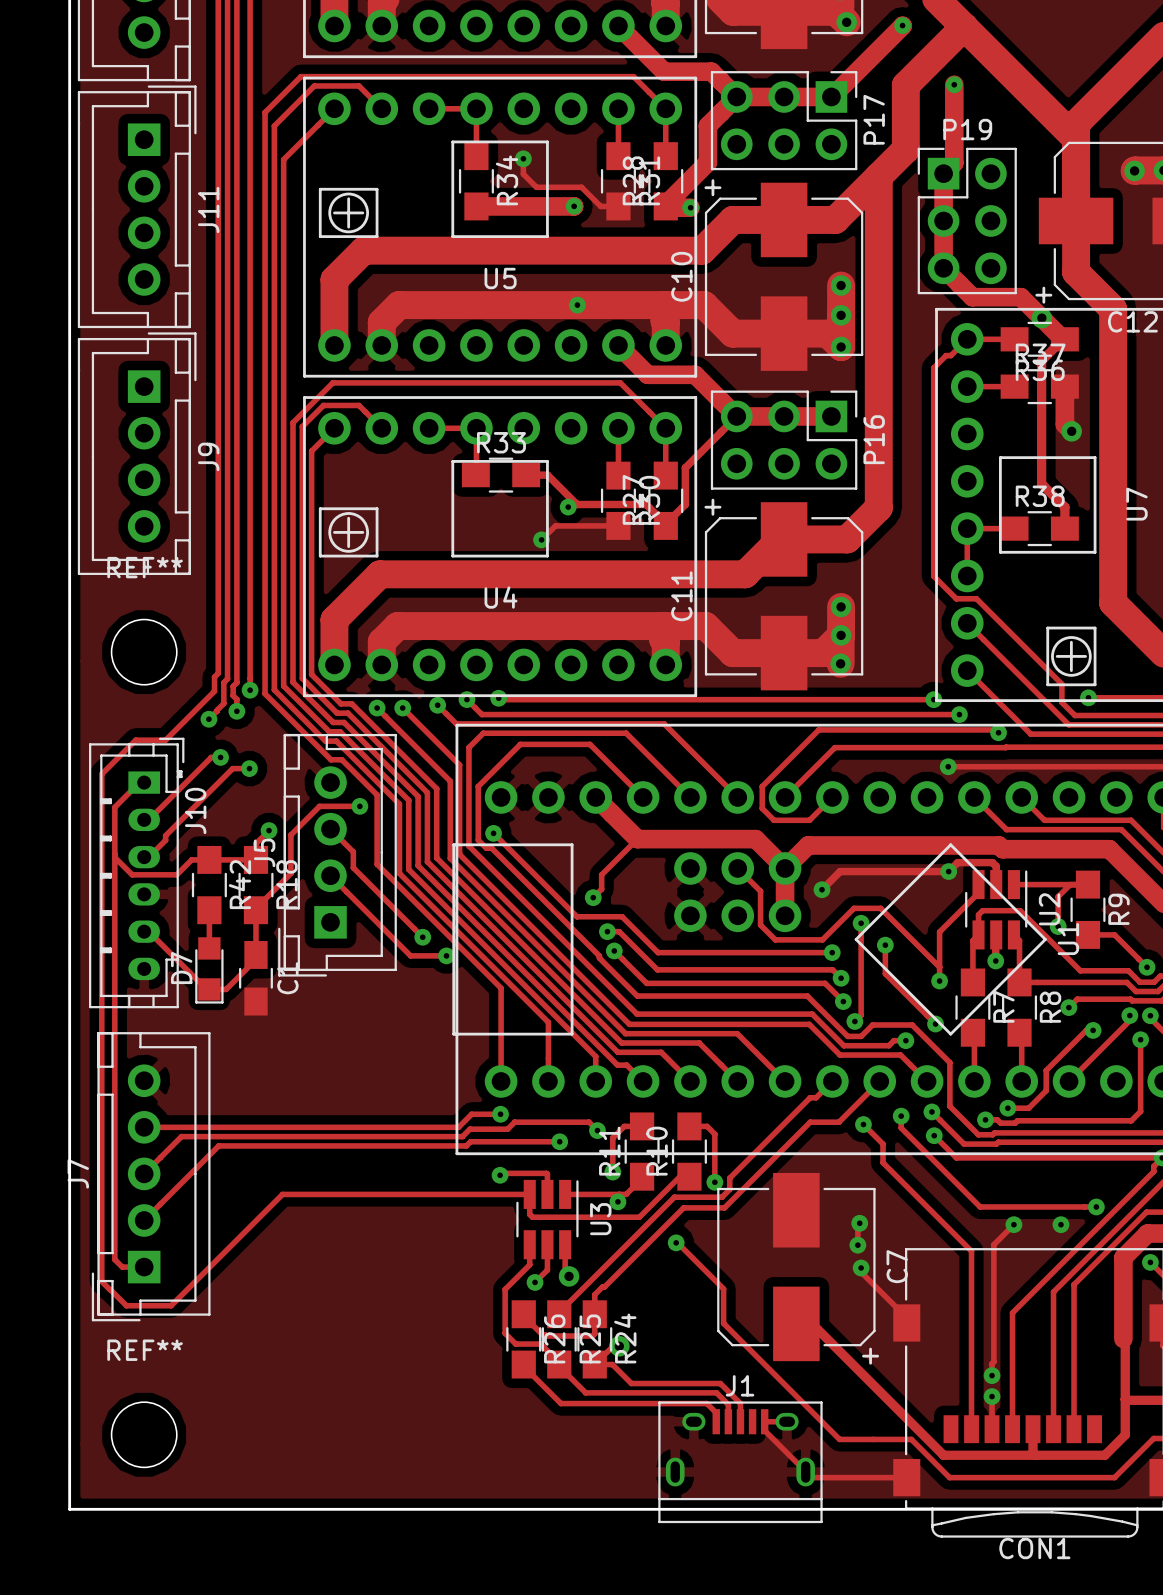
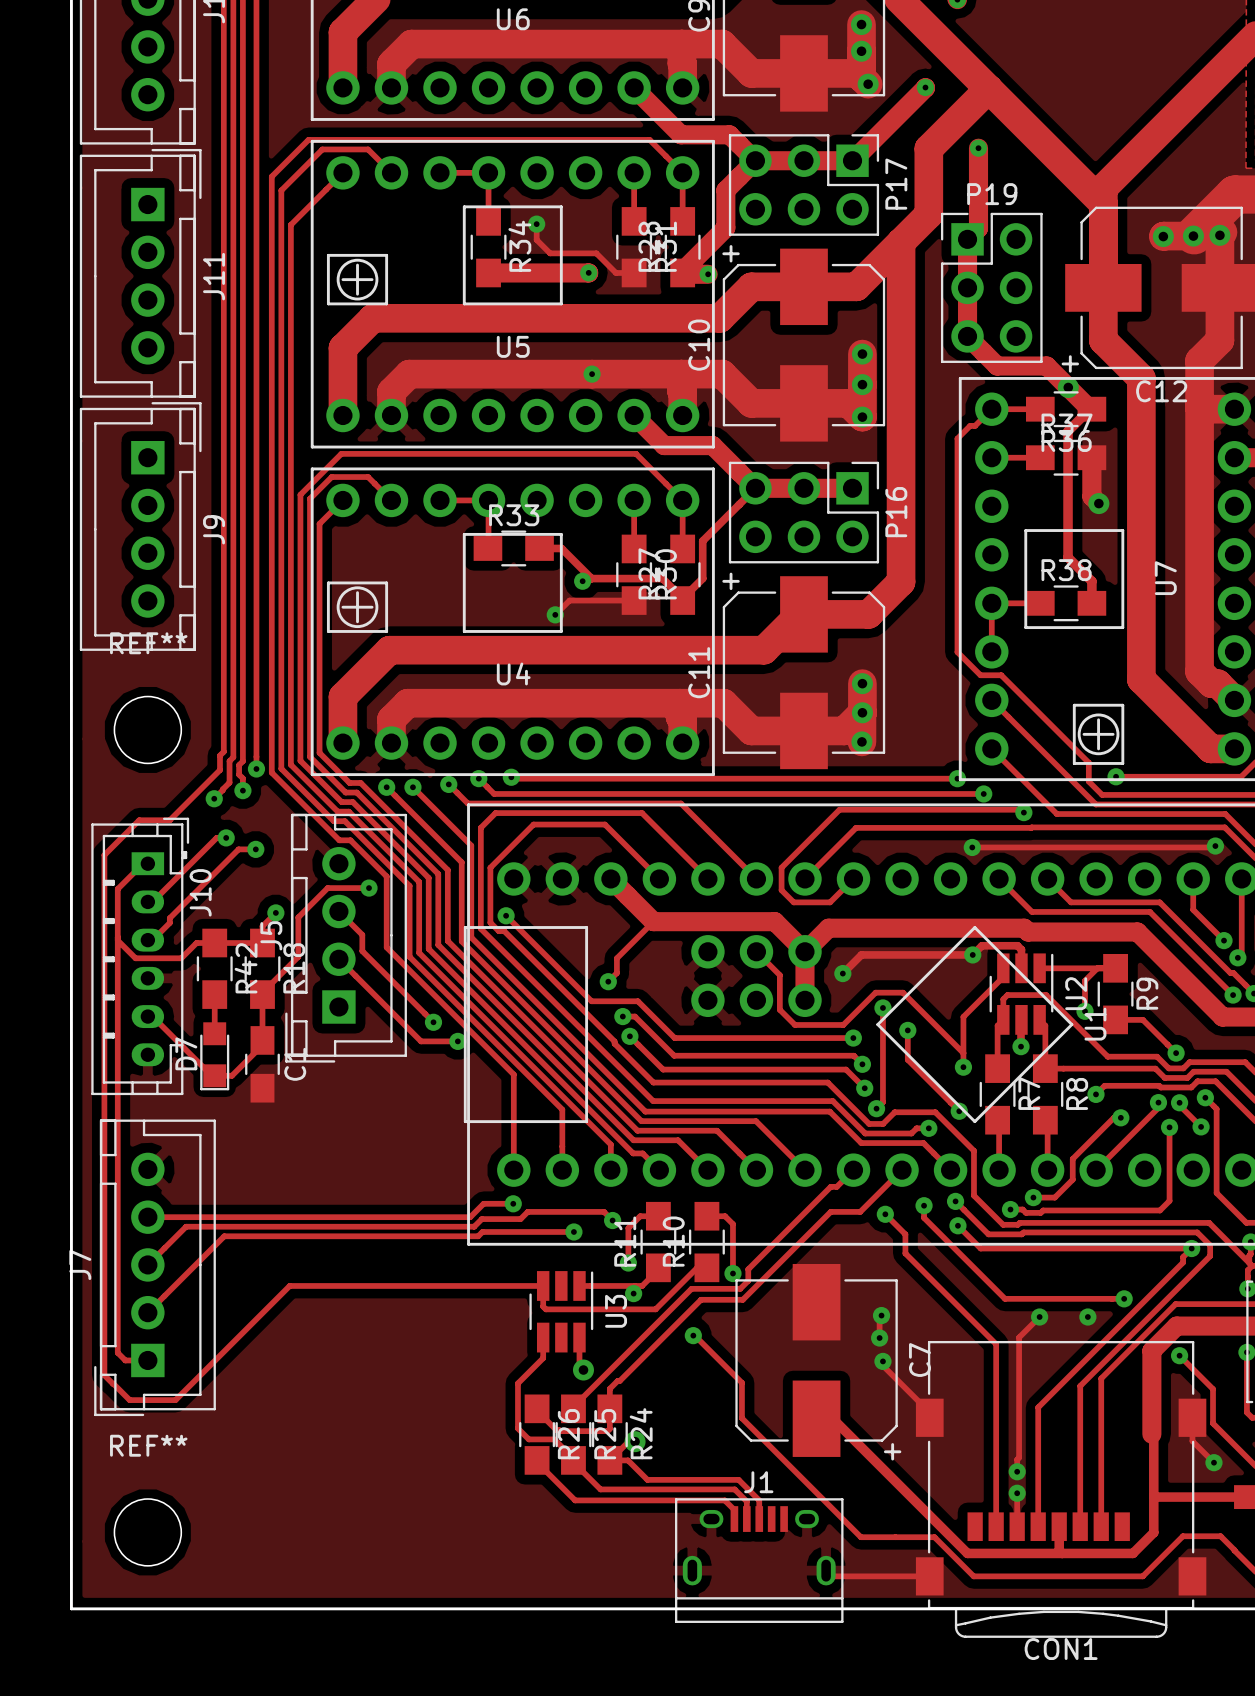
track: (500, 1175) (502, 1173) (546, 1173) (547, 1194) -> none
via: (500, 1175) -> none
track: (547, 1244) (547, 1270) (535, 1282) -> none
via: (535, 1282) -> none
track: (787, 1421) (764, 1421) (764, 1430) (805, 1472) -> none

